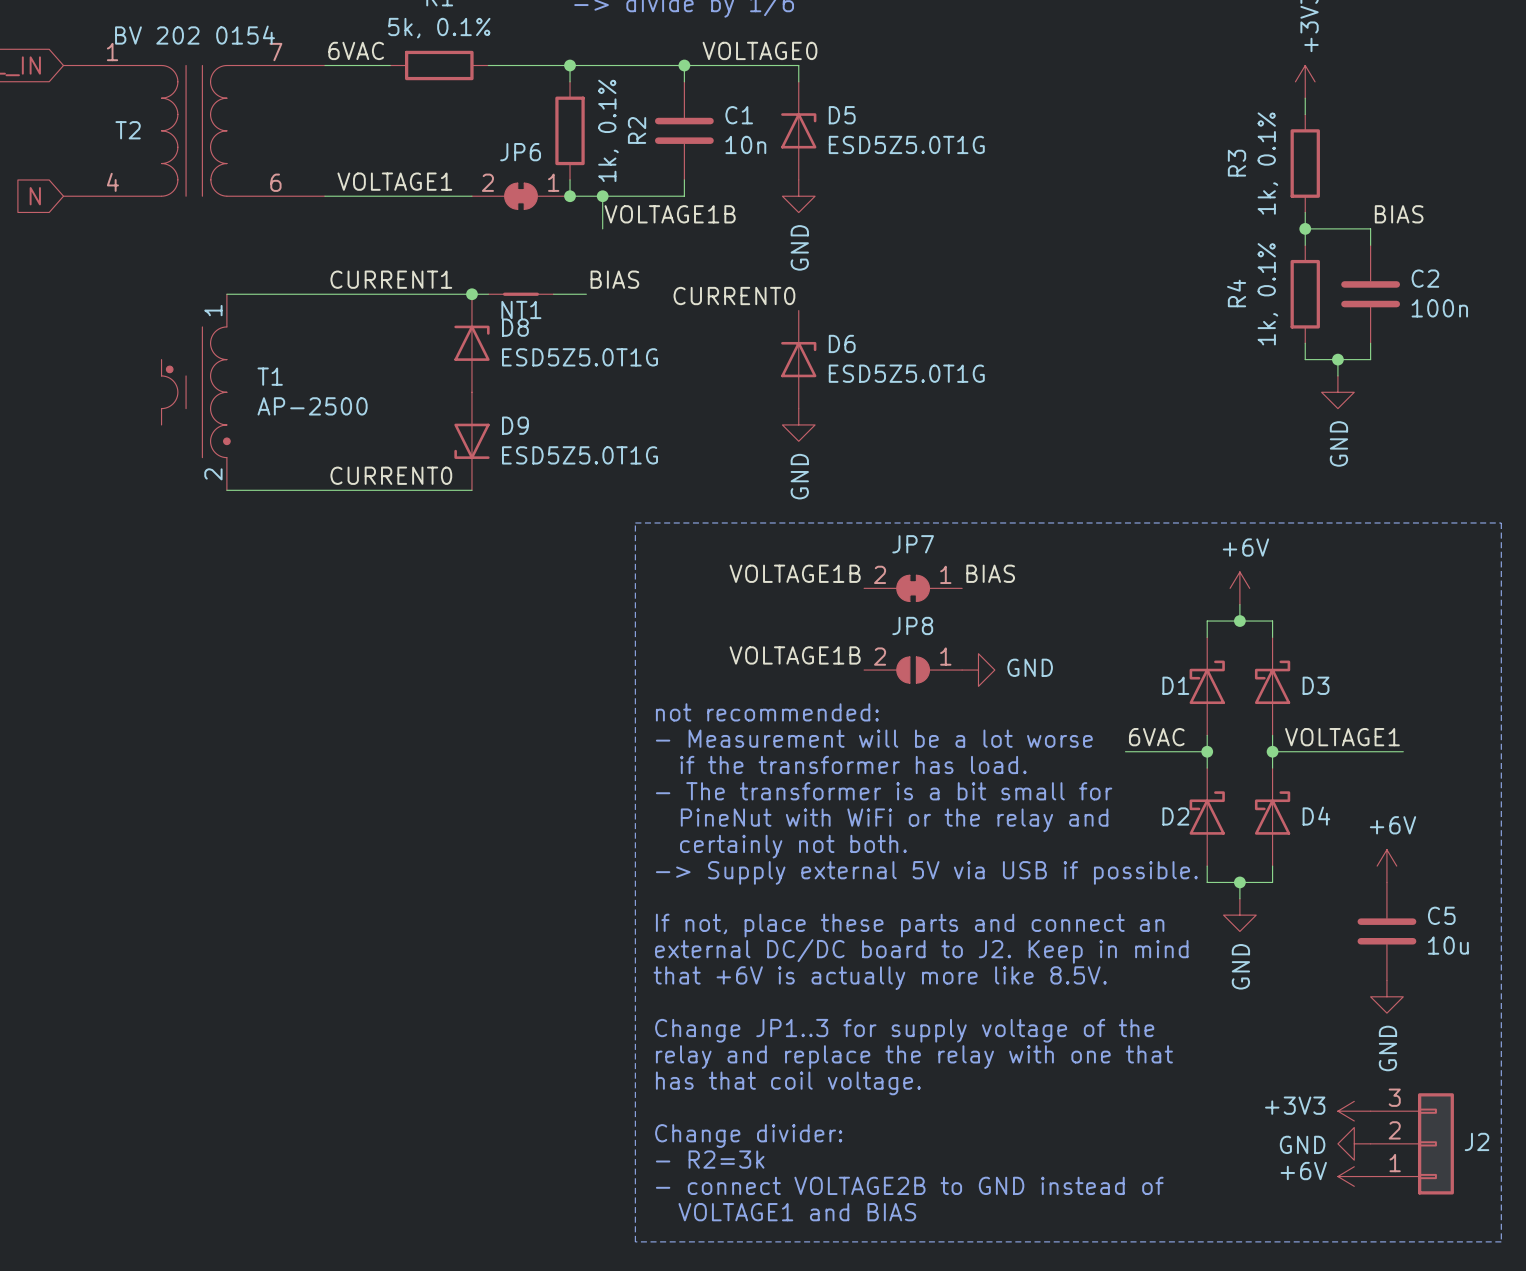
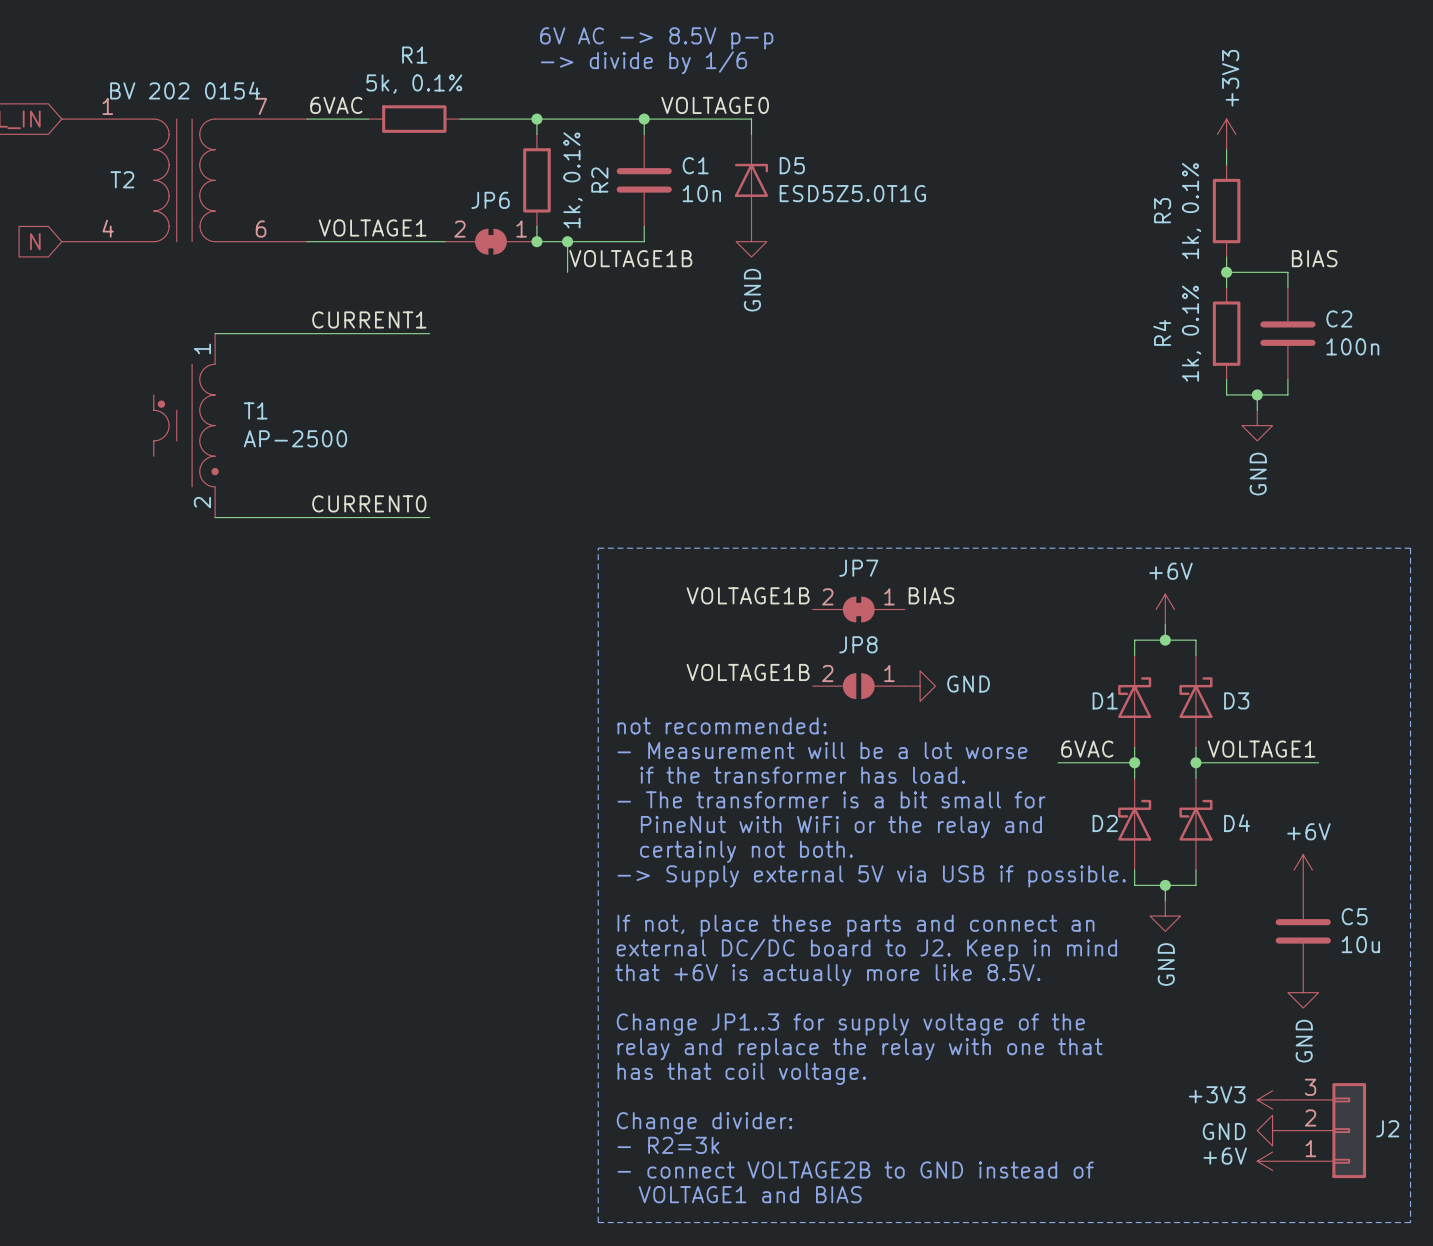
label: BIAS (614, 279) -> none
wire: (455, 294) (488, 294) -> none
junction: (471, 294) -> none
NT1: (520, 294) -> none
wire: (553, 294) (586, 294) -> none
label: CURRENT0 (734, 296) -> none
D8: ESD5Z5.0T1G (471, 343) -> none
D6: ESD5Z5.0T1G (798, 359) -> none
power symbol: GND (798, 424) -> none
D9: ESD5Z5.0T1G (471, 441) -> none
wire: (455, 490) (471, 490) -> none

